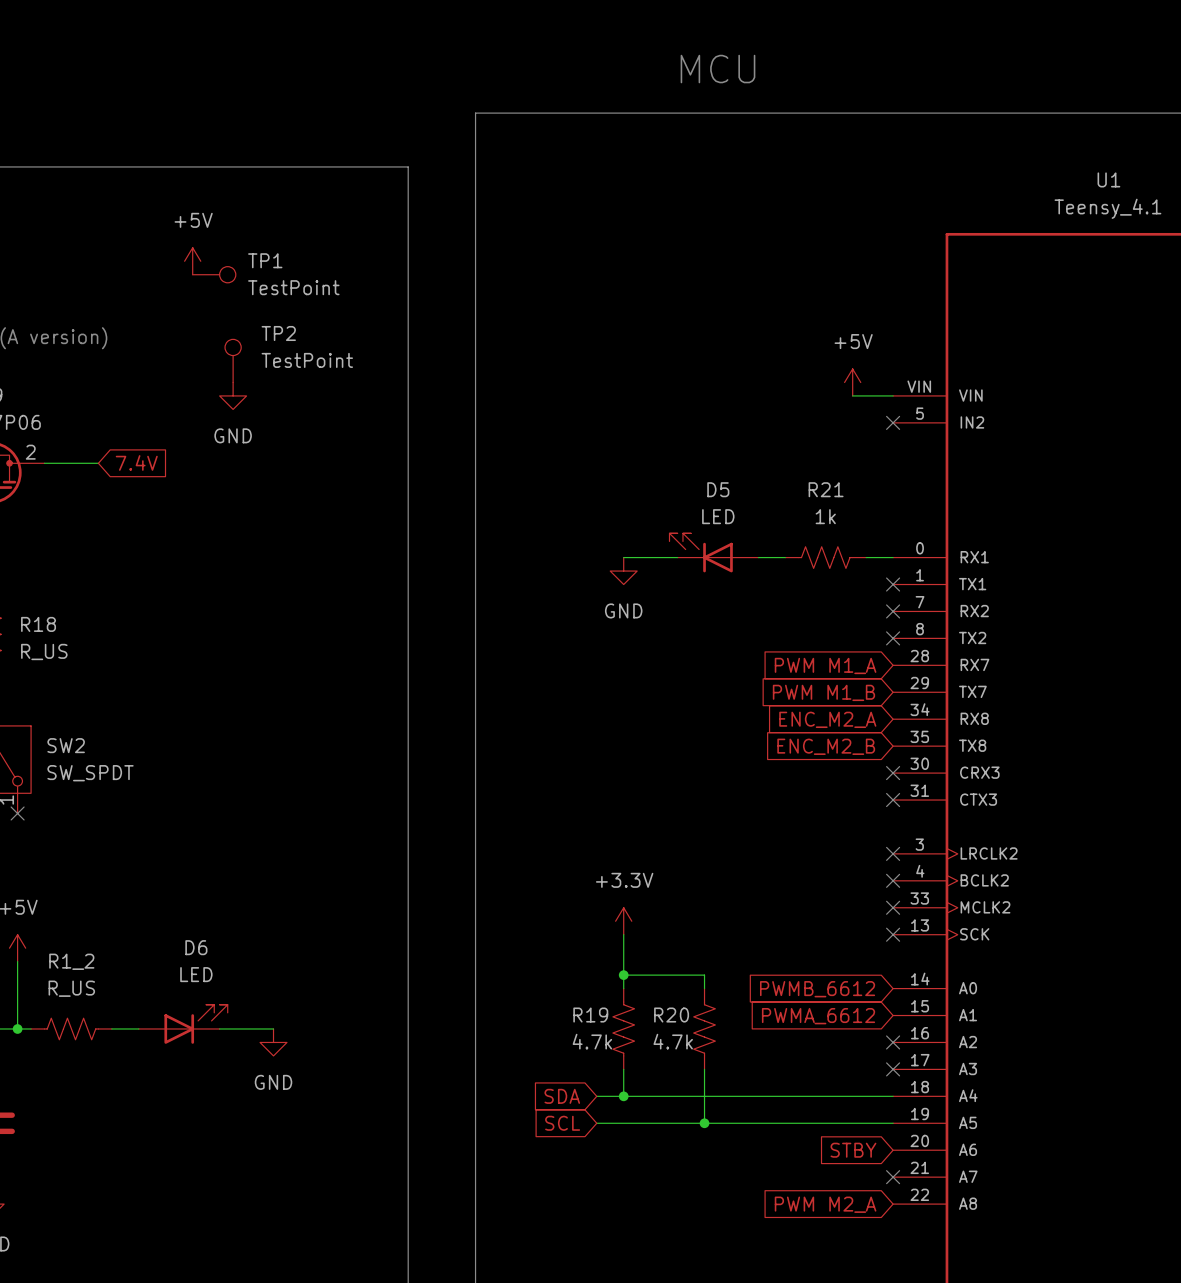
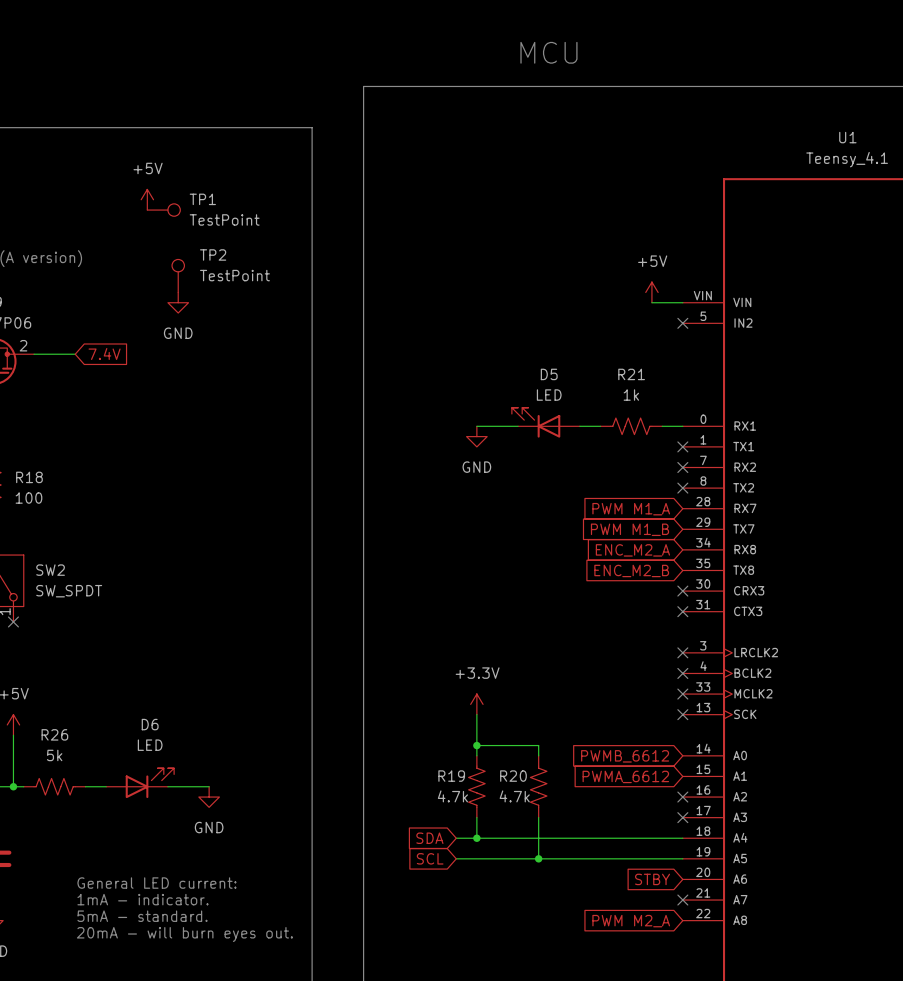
R18 value: R_US (44, 651) -> 100 (28, 498)
R1_2 name: R1_2 (71, 961) -> R26 (54, 734)
R1_2 value: R_US (71, 988) -> 5k (54, 755)
text: none -> General LED current: (156, 883)
text: none -> 1mA - indicator. (143, 899)
text: none -> 5mA - standard. (142, 916)
text: none -> 20mA - will burn eyes out. (184, 934)

